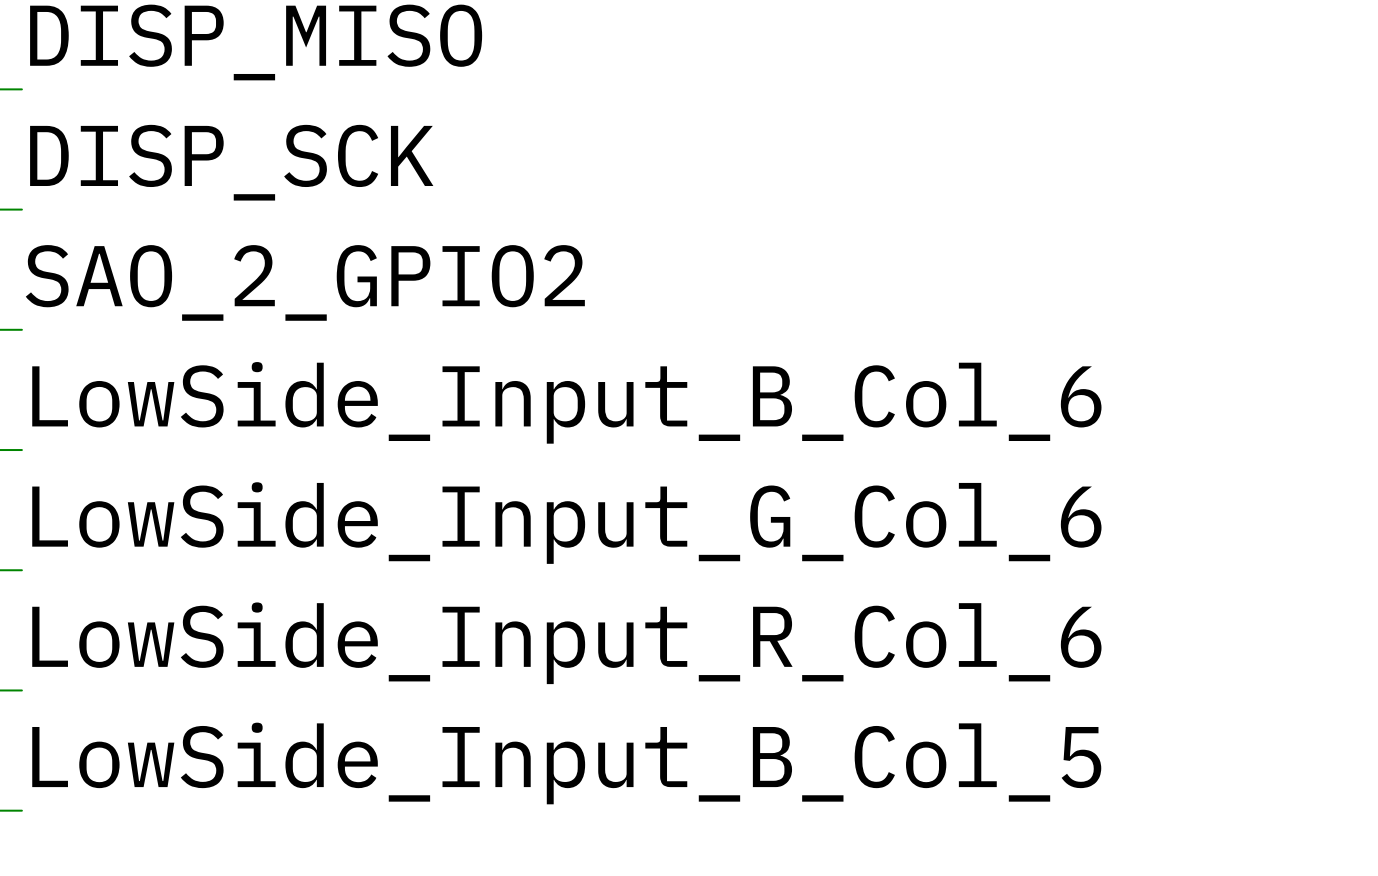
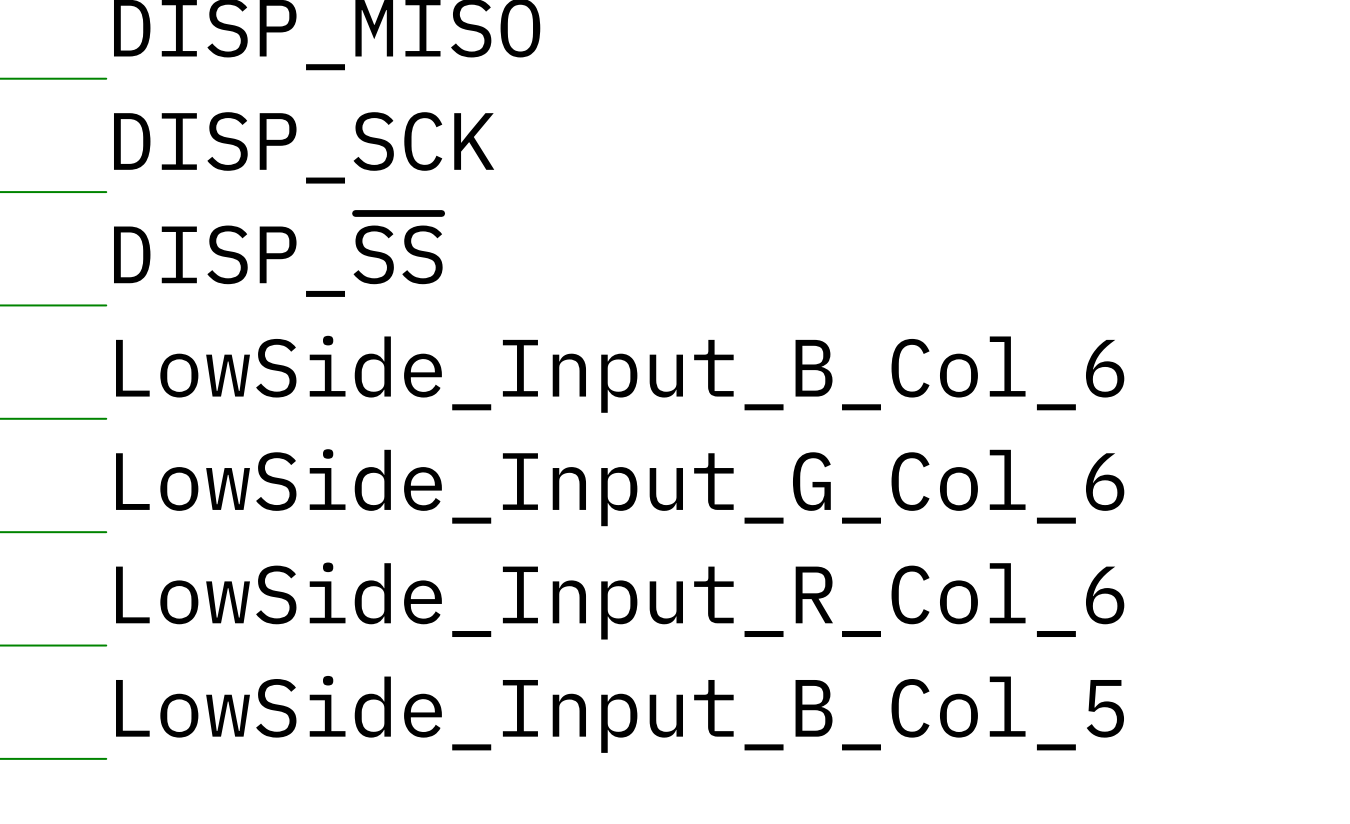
label: SAO_2_GPIO2 (305, 282) -> DISP_~{SS} (278, 255)

